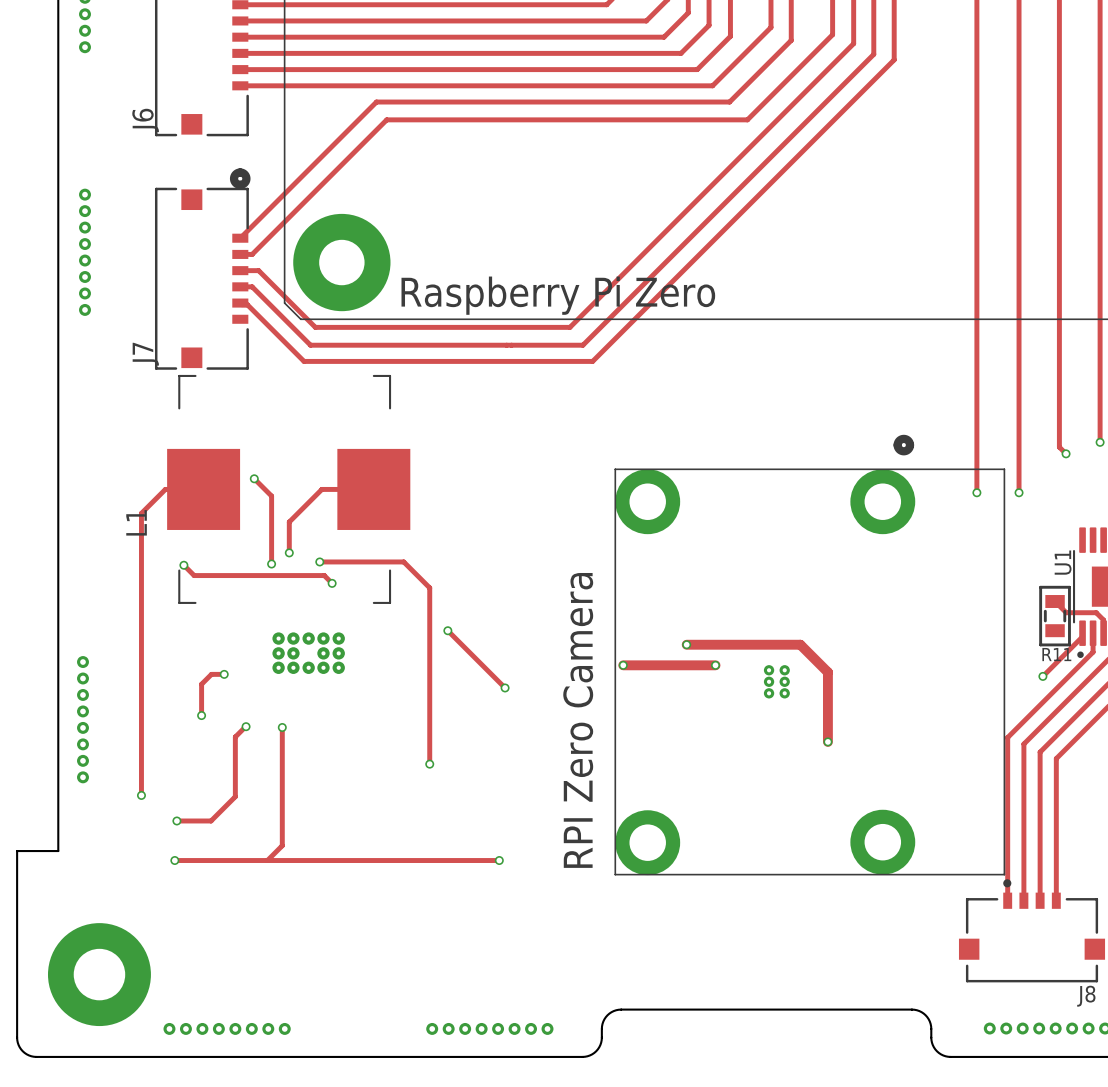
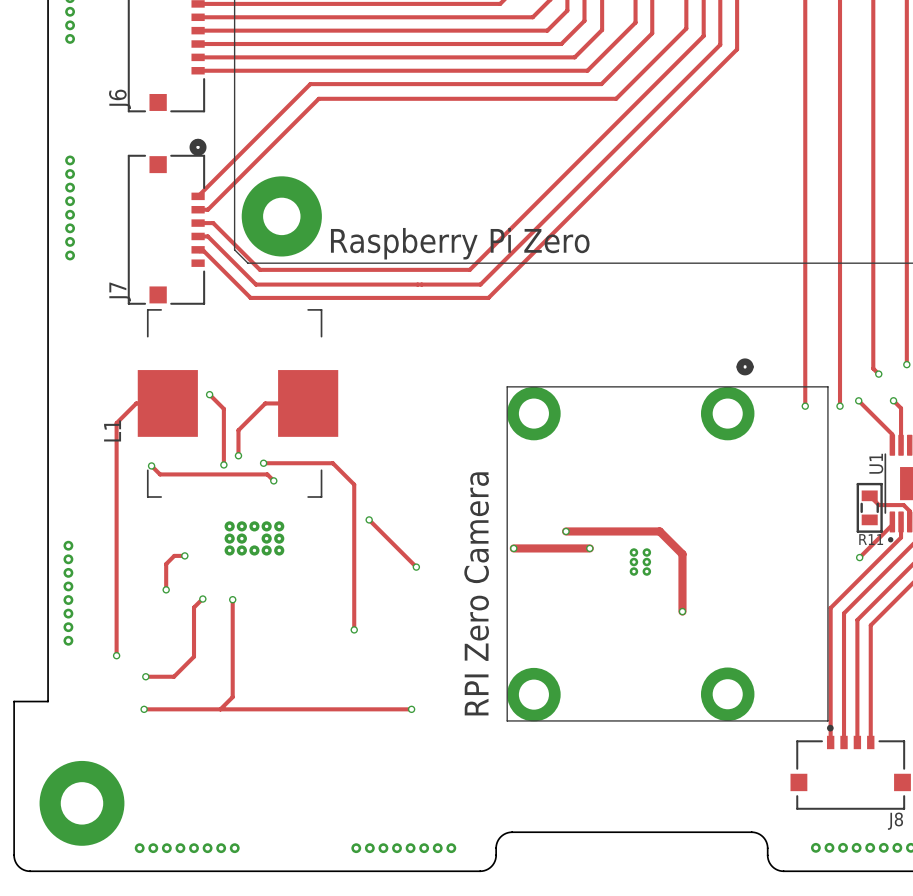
track: none -> (858, 400) (892, 434) (892, 445)
via: none -> (858, 400)
track: none -> (893, 400) (901, 408) (901, 445)
via: none -> (893, 400)

